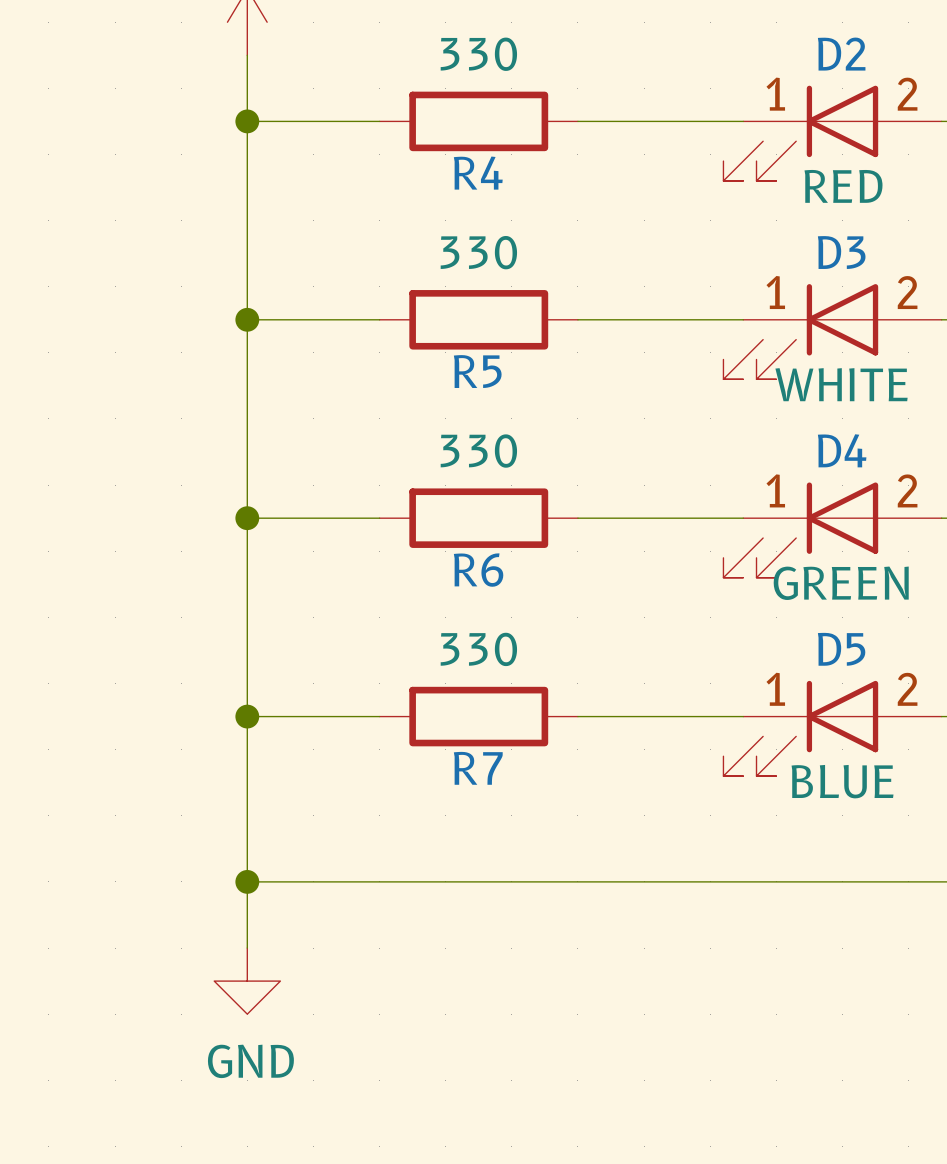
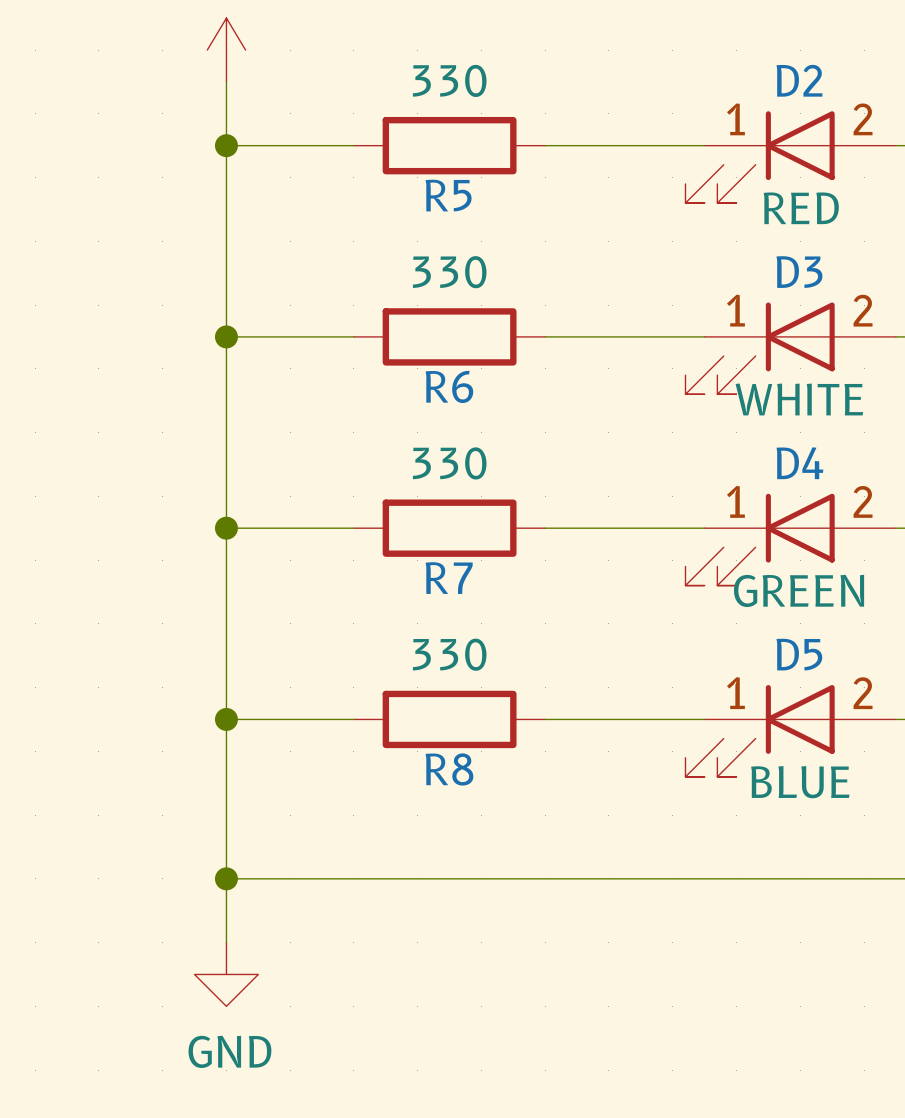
R4 name: R4 (478, 173) -> R5 (448, 195)
R5 name: R5 (477, 371) -> R6 (449, 386)
R6 name: R6 (478, 570) -> R7 (449, 578)
R7 name: R7 (478, 768) -> R8 (449, 769)

